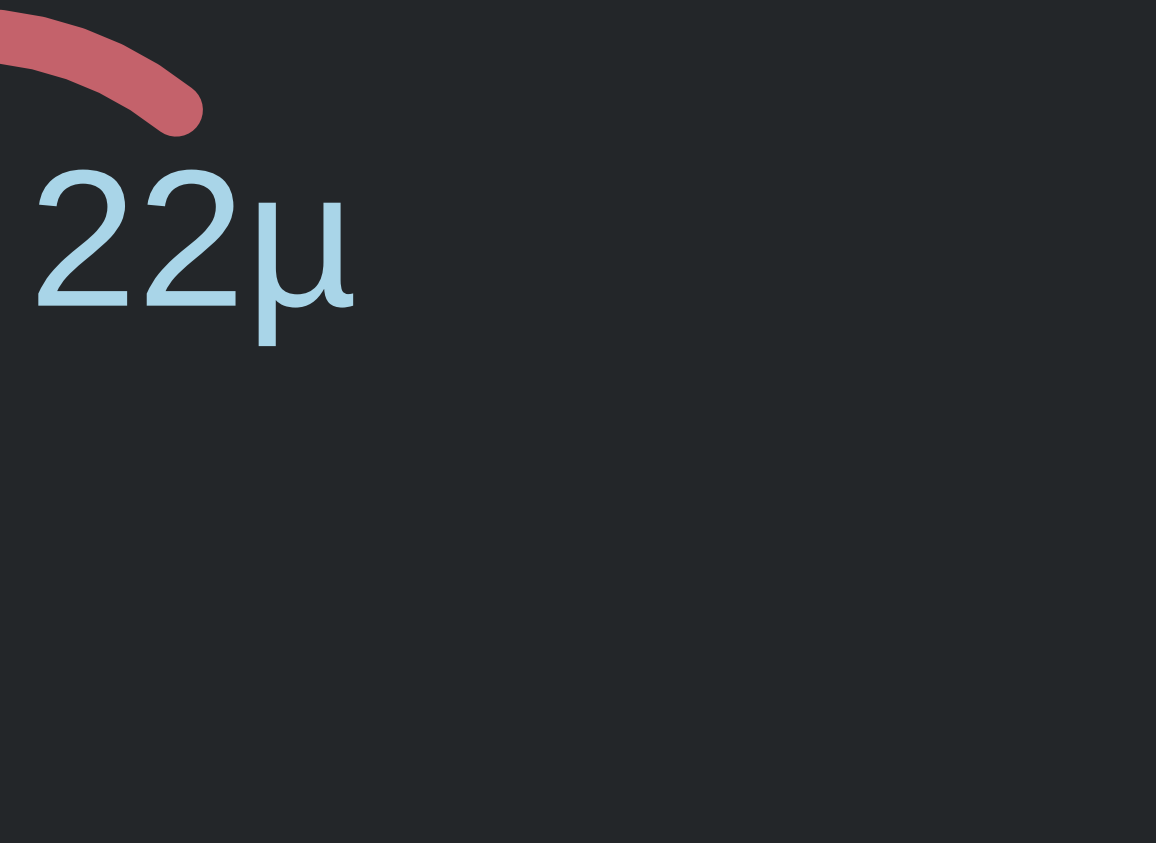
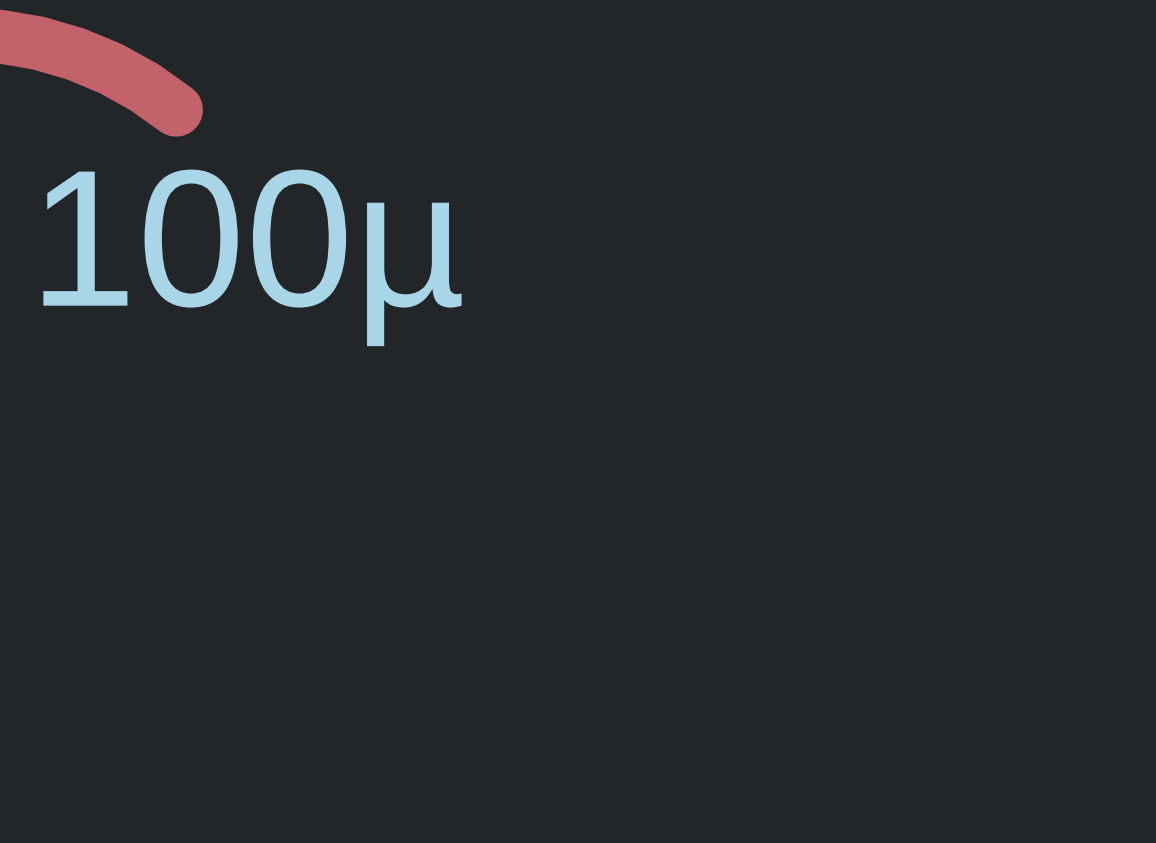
part value: 22µ (195, 257) -> 100µ (252, 257)

